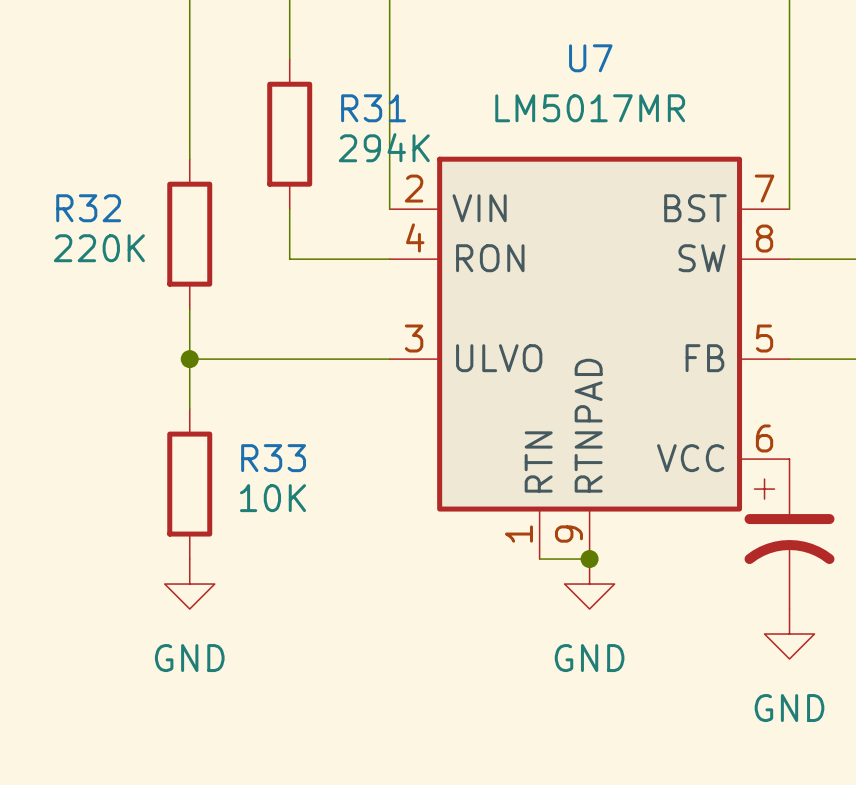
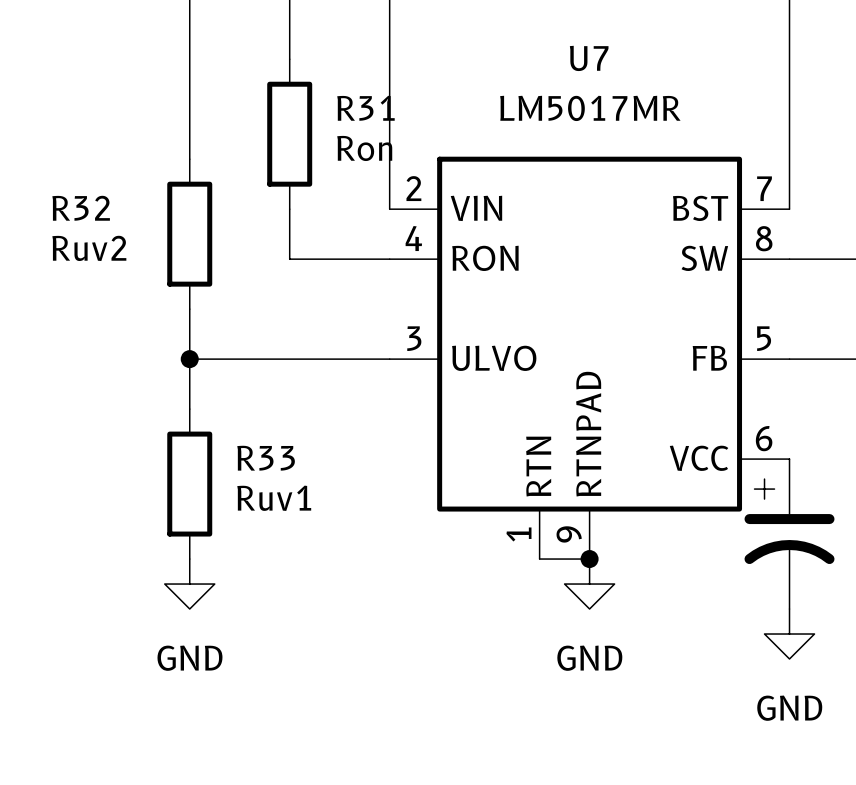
R31 value: 294K (384, 147) -> Ron (364, 148)
R32 value: 220K (99, 248) -> Ruv2 (89, 248)
R33 value: 10K (273, 498) -> Ruv1 (274, 498)

